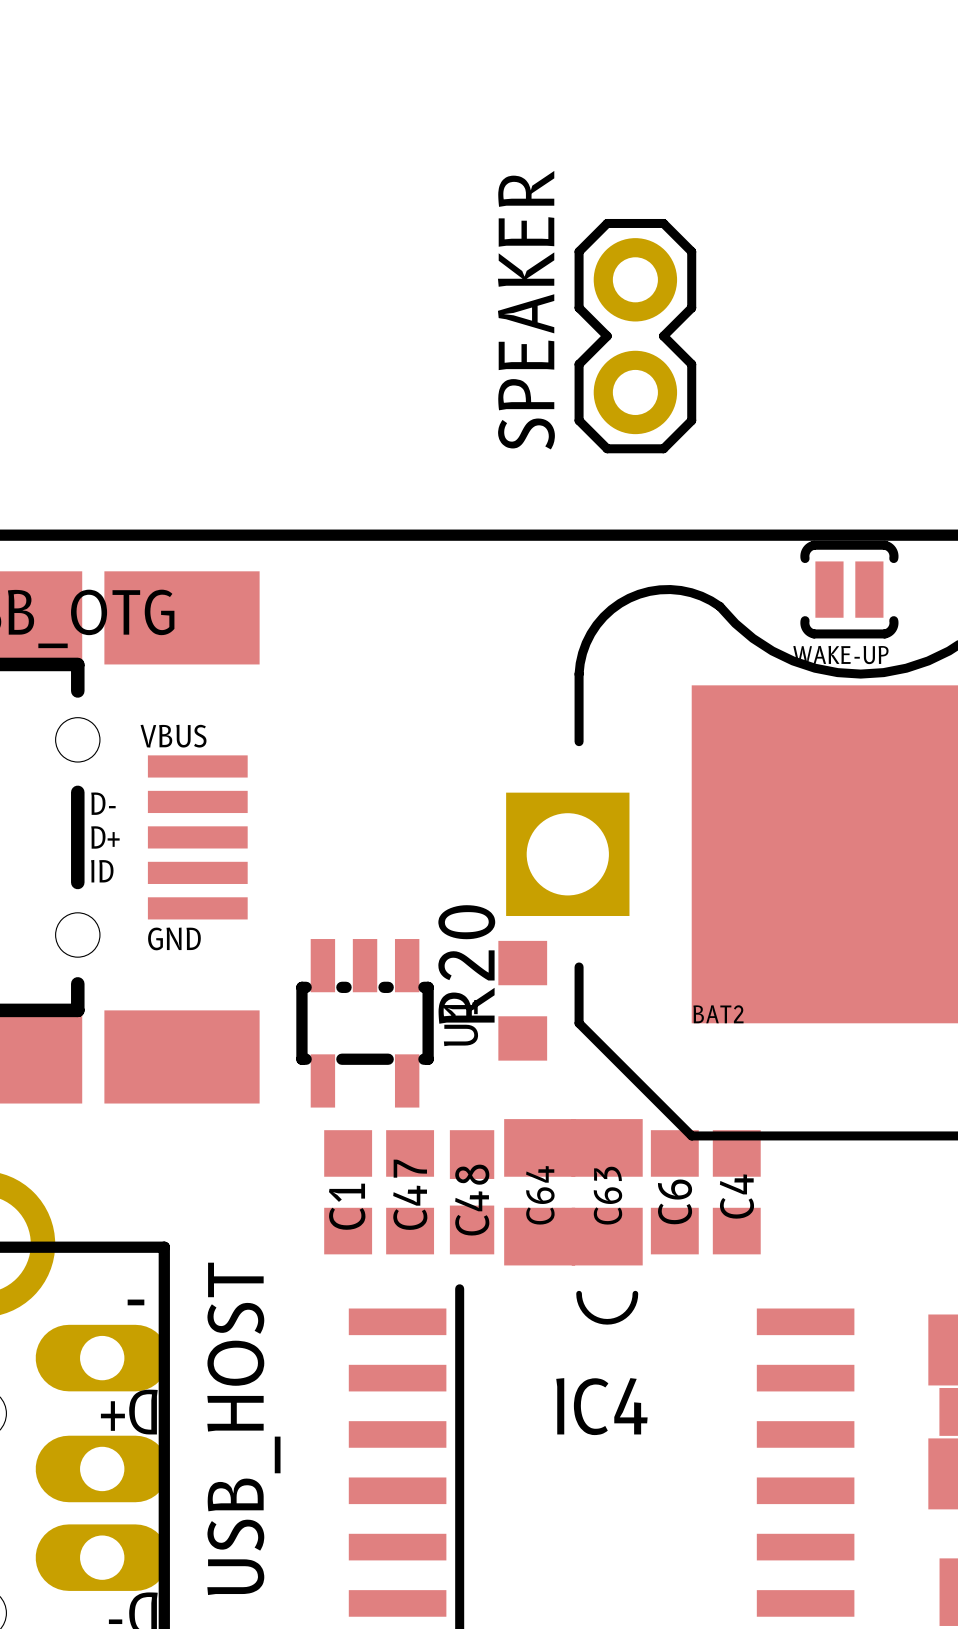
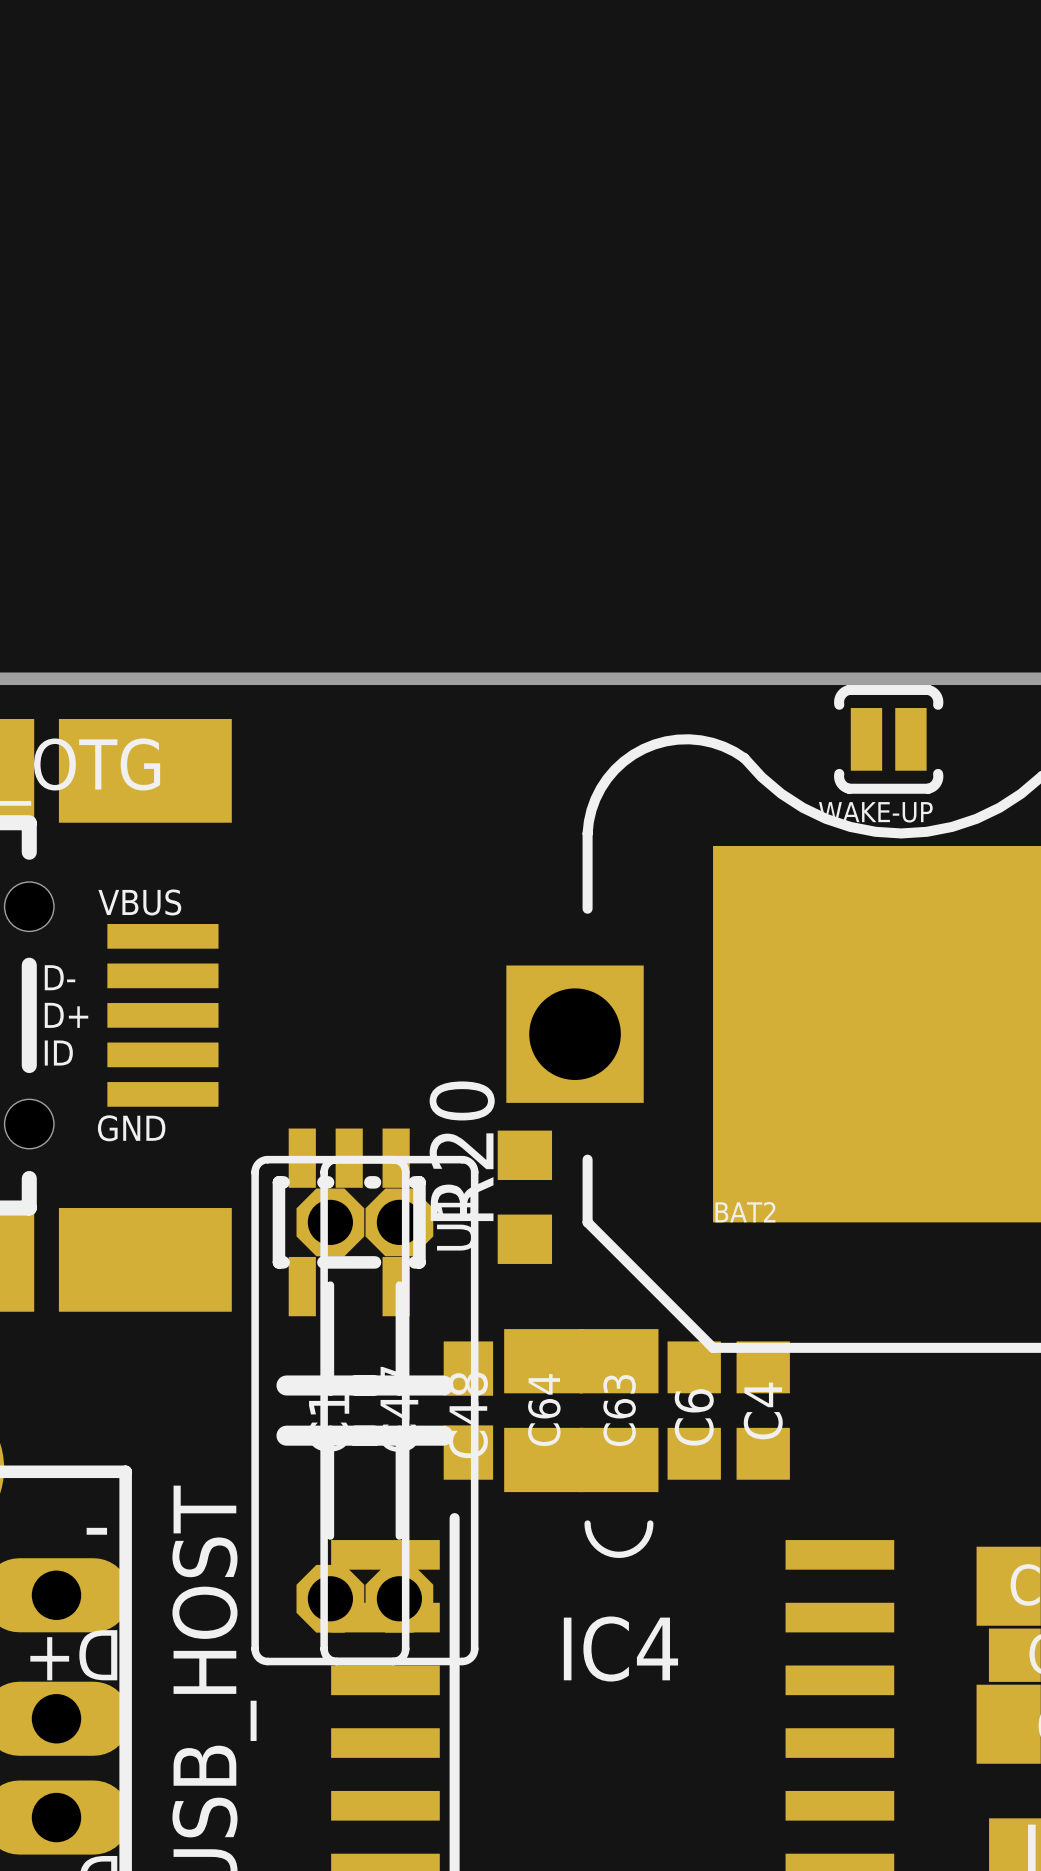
SPEAKER: (635, 336) -> none
C1 footprint: [324, 1130, 373, 1255] -> [251, 1155, 410, 1666]
C47 footprint: [386, 1130, 435, 1255] -> [320, 1155, 479, 1666]

